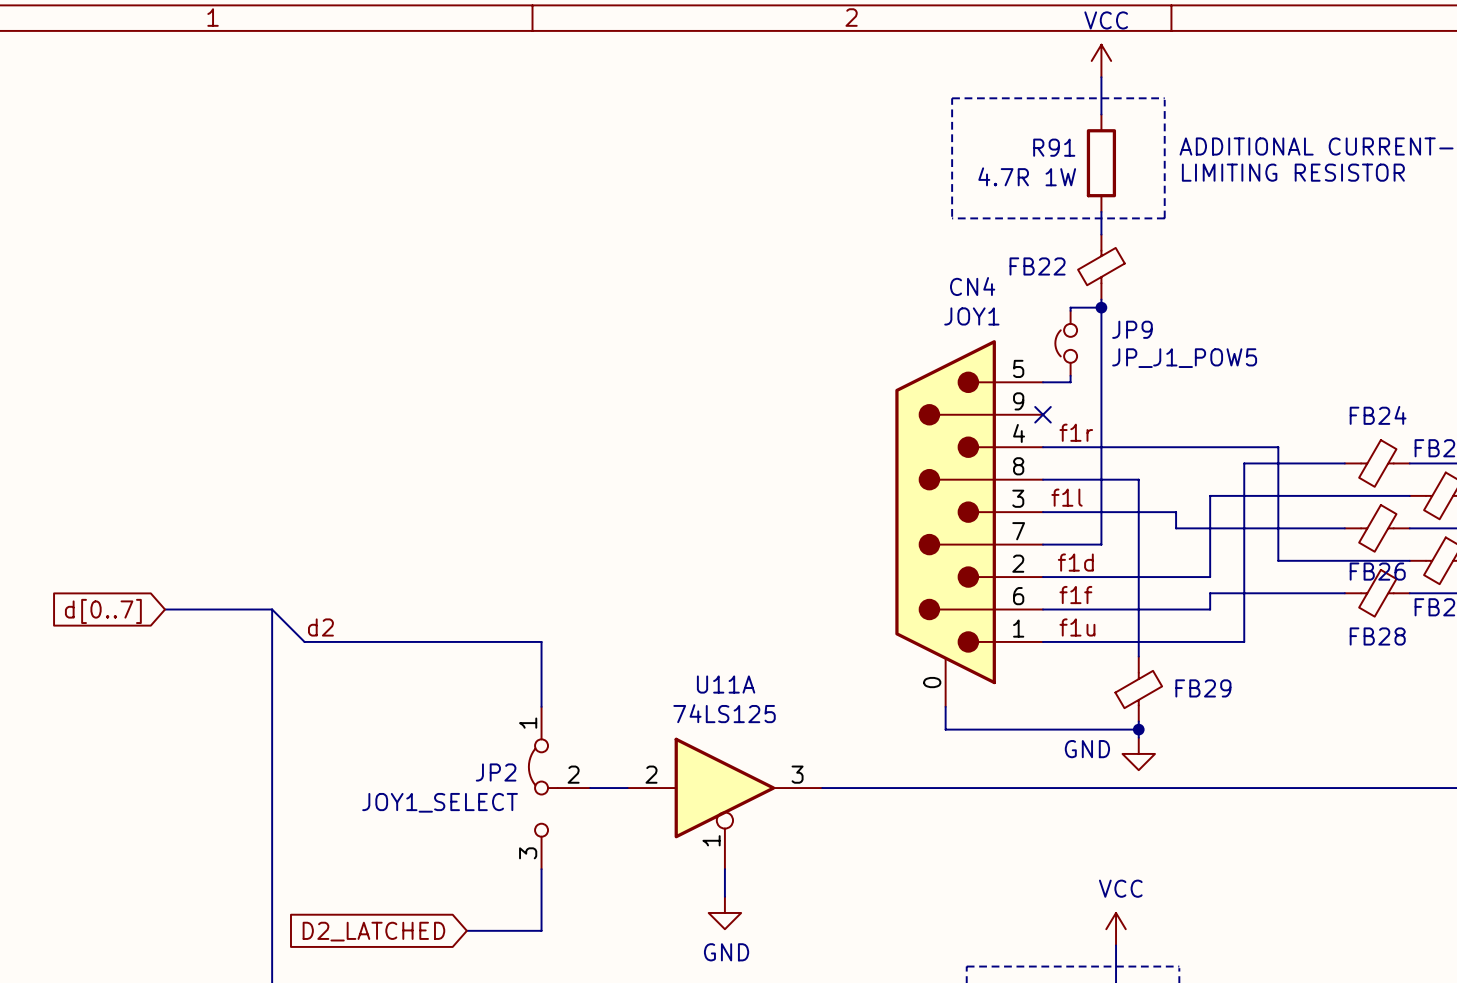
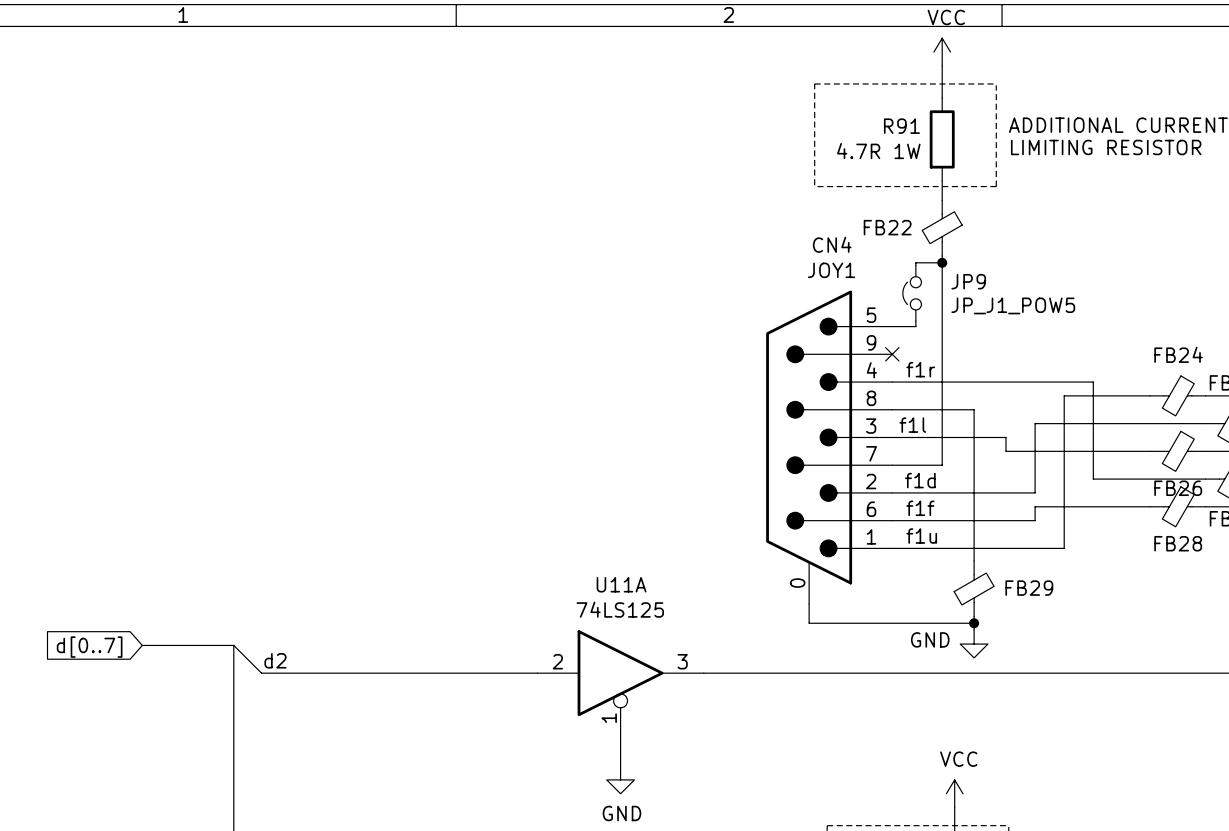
bus: (165, 609) (272, 609) (272, 755) -> (142, 645) (233, 645)
wire: (272, 609) (304, 641) (541, 641) (541, 706) -> none
global label position: d[0..7] (103, 611) -> d[0..7] (89, 647)
label position: d2 (320, 627) -> d2 (275, 660)
wire: none -> (233, 645) (261, 673) (505, 673)
JP2: JOY1_SELECT (559, 788) -> none
wire: (541, 869) (541, 930) (466, 930) -> none
global label: D2_LATCHED (373, 931) -> none

